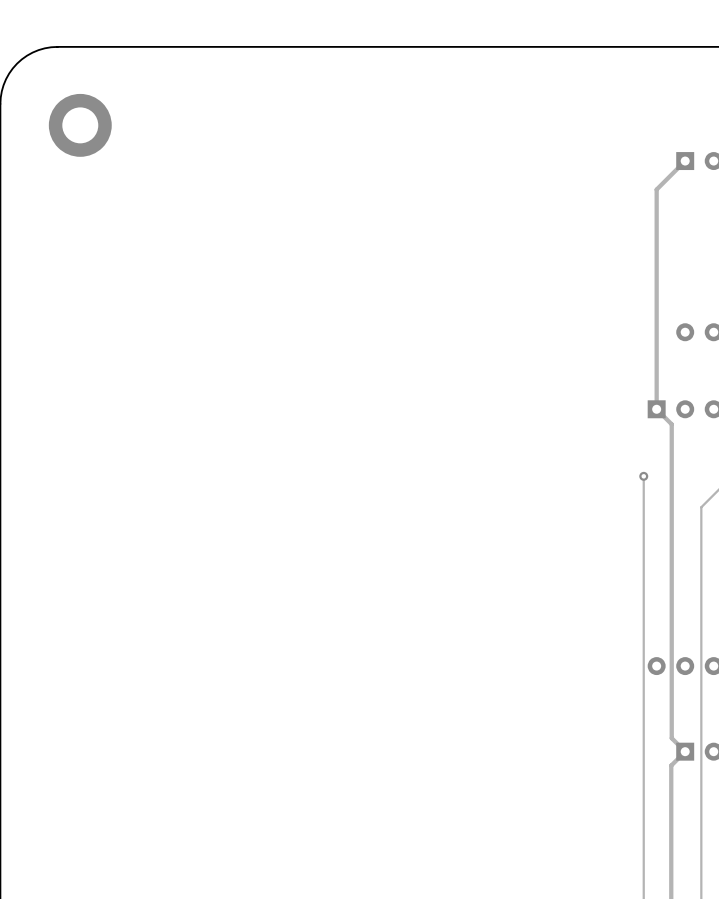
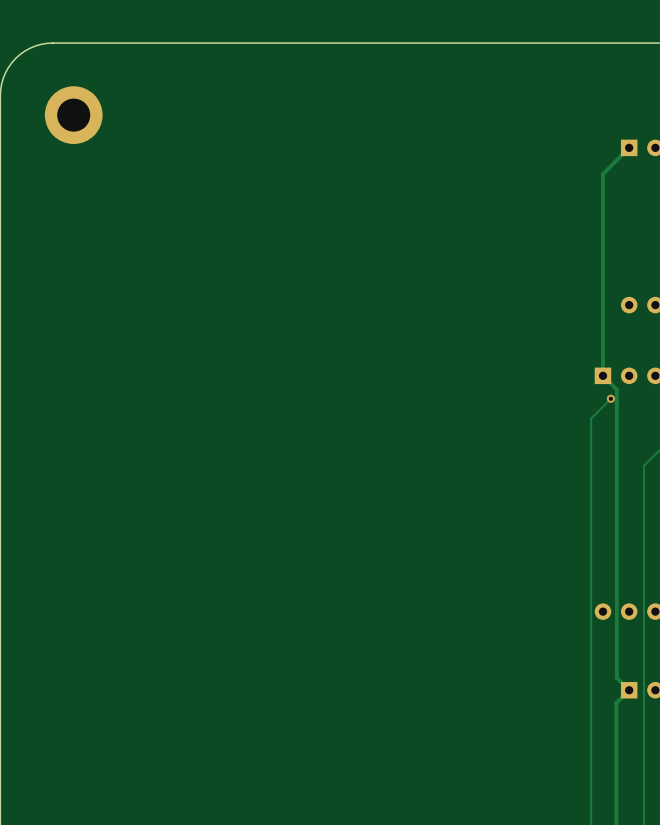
track: none -> (610, 398) (591, 418) (591, 437)
via position: (643, 476) -> (610, 398)

